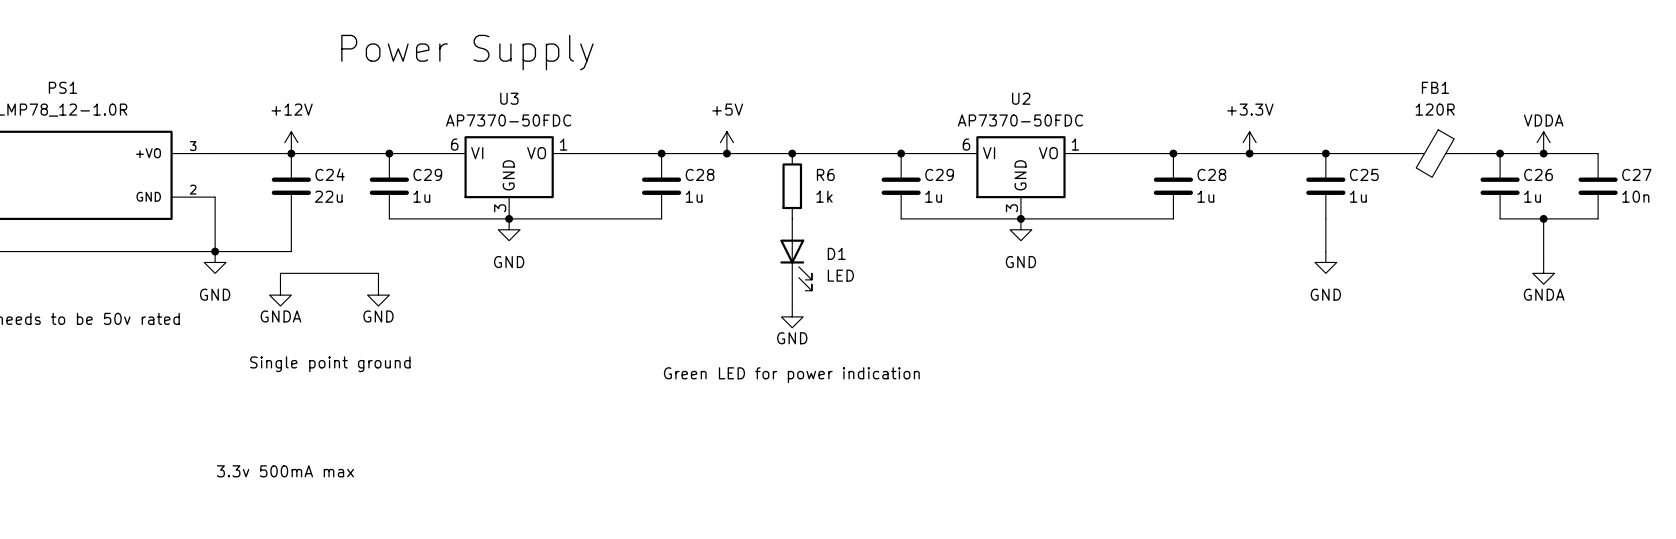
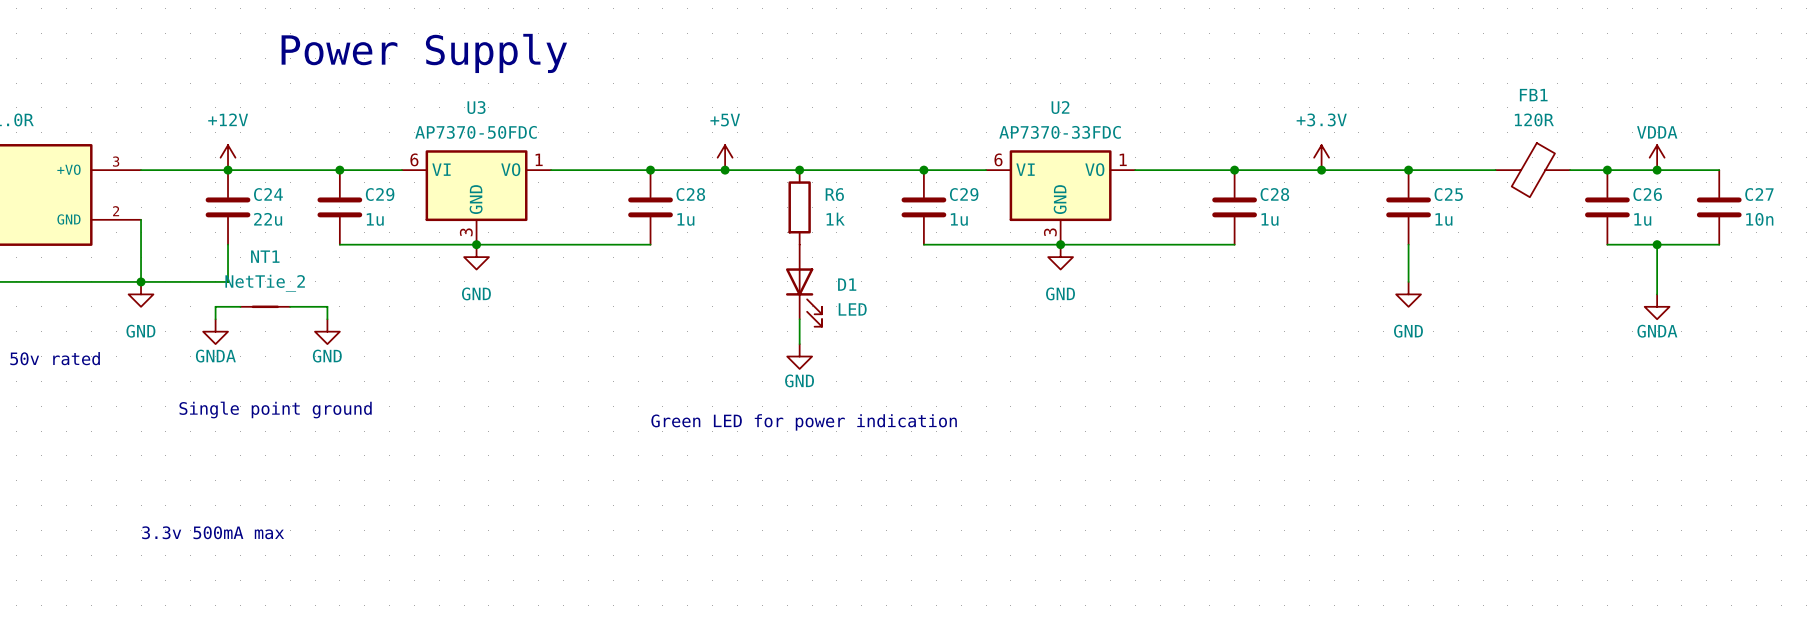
U2 value: AP7370-50FDC (1020, 120) -> AP7370-33FDC (1060, 132)
NT1: none -> NetTie_2 (265, 306)

